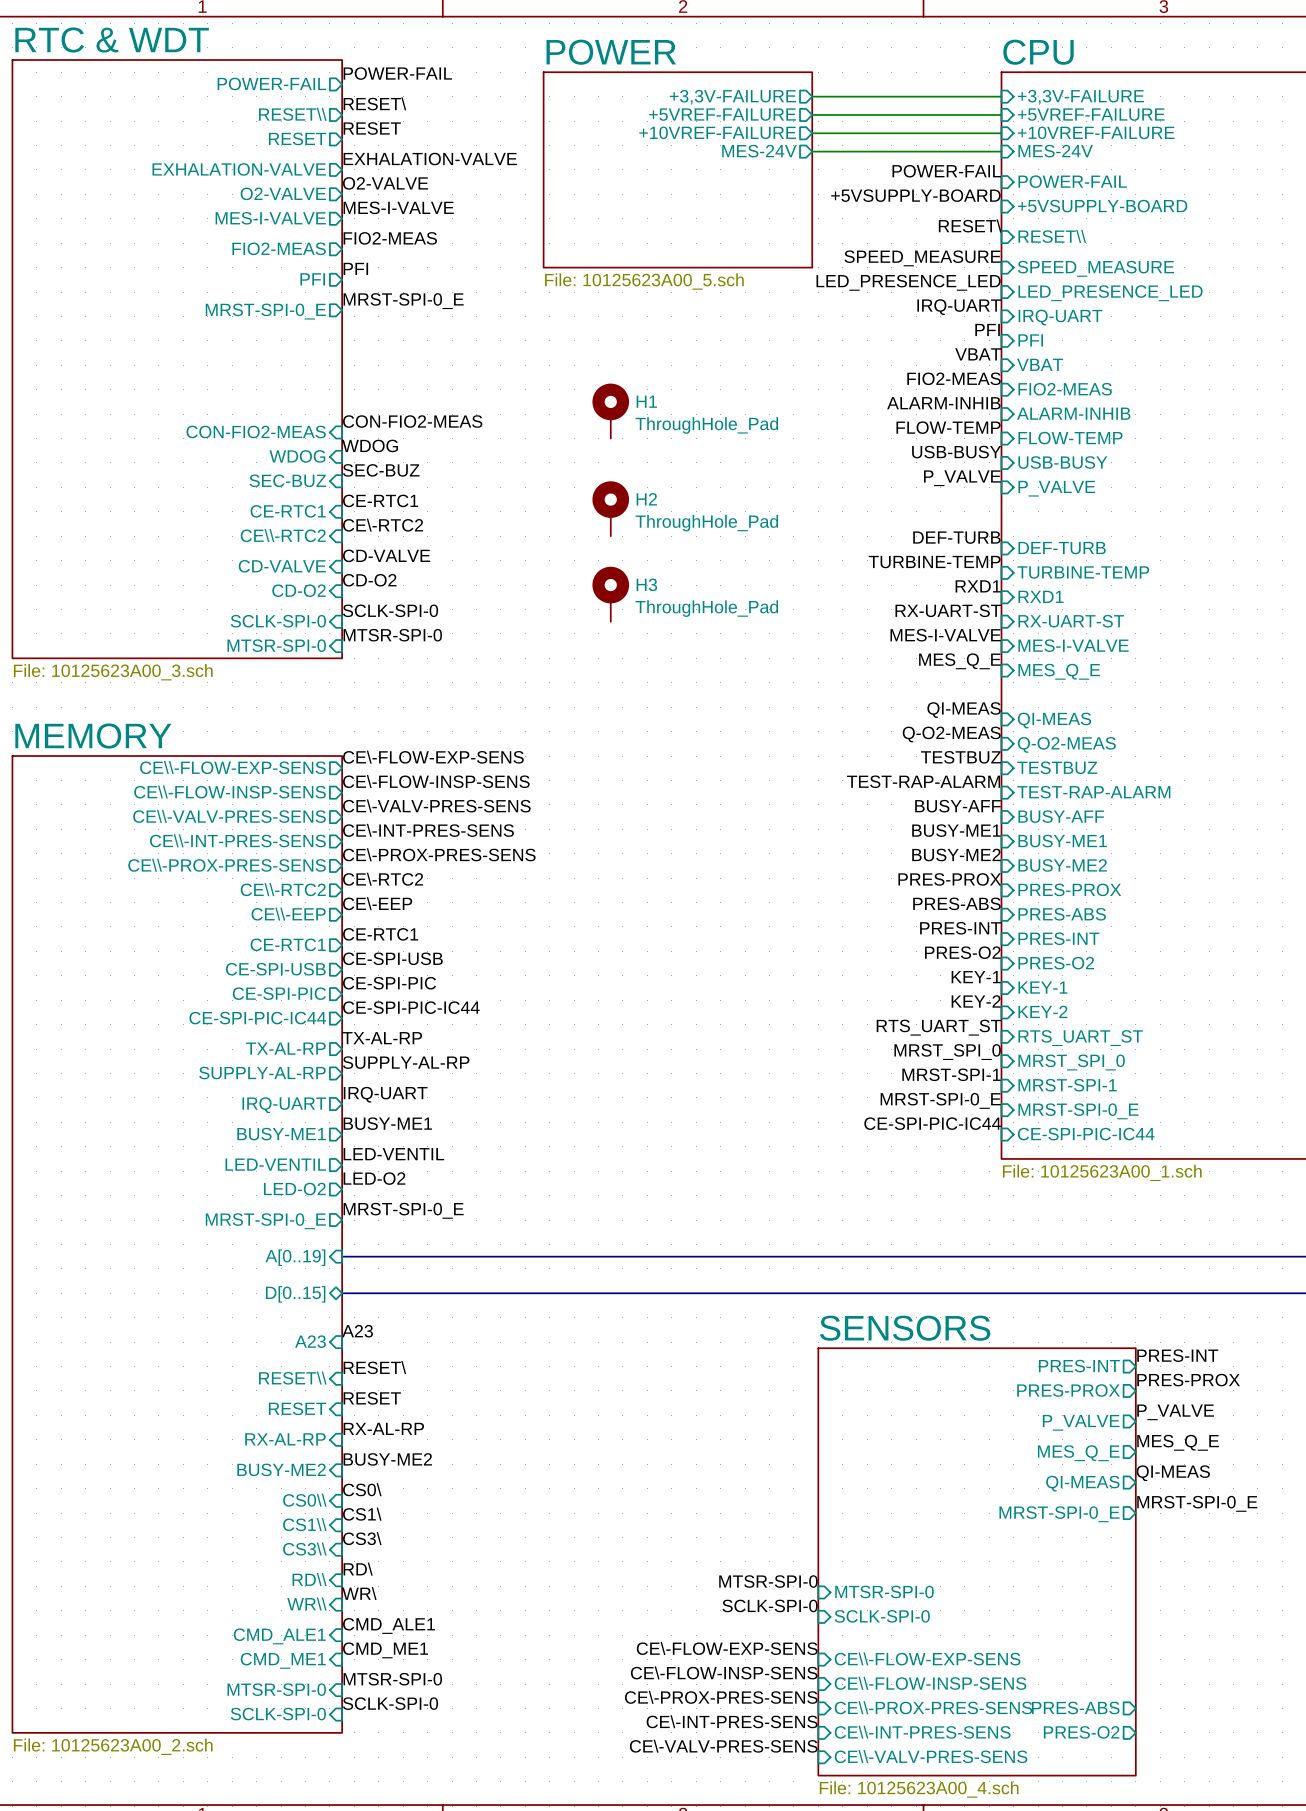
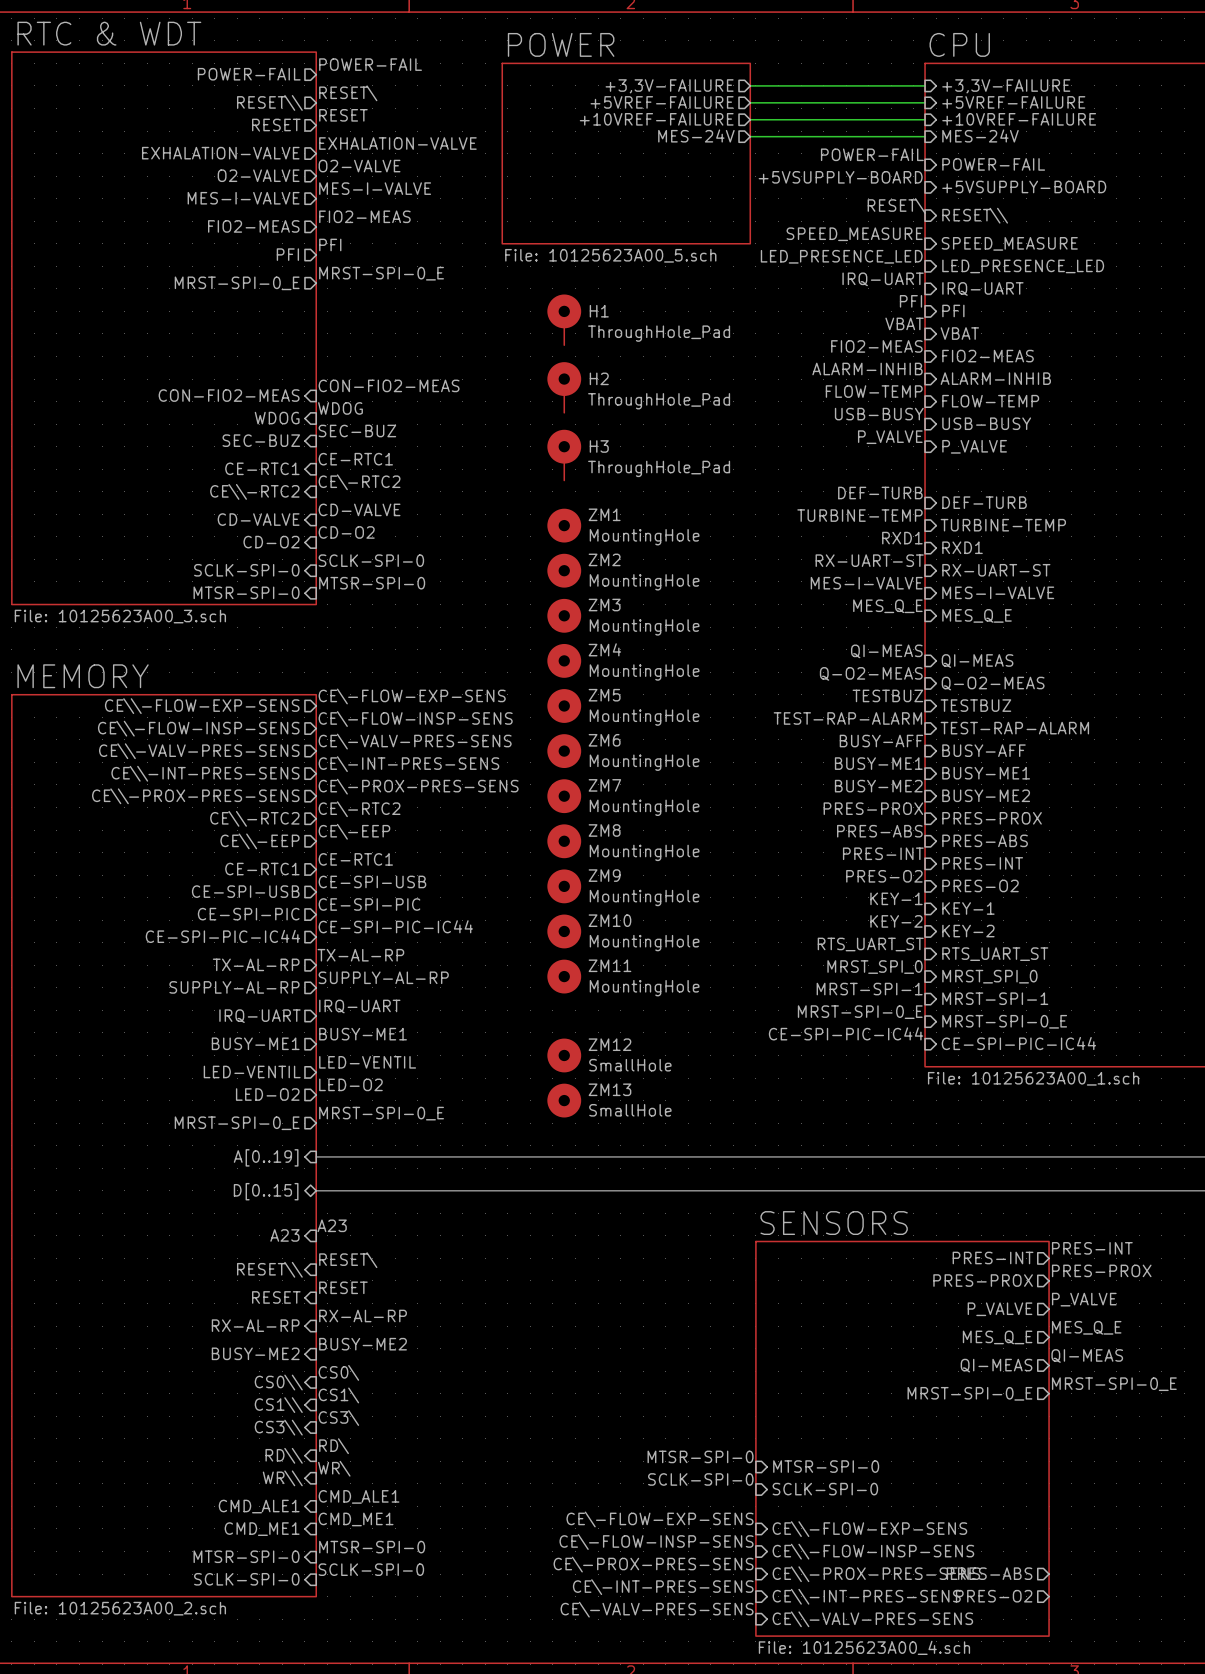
H1 position: (610, 411) -> (564, 319)
H2 position: (610, 508) -> (564, 387)
ZM1: none -> MountingHole (564, 525)
H3 position: (610, 594) -> (564, 455)
ZM2: none -> MountingHole (564, 570)
ZM3: none -> MountingHole (564, 615)
ZM4: none -> MountingHole (564, 660)
ZM5: none -> MountingHole (564, 705)
ZM6: none -> MountingHole (564, 751)
ZM7: none -> MountingHole (564, 796)
ZM8: none -> MountingHole (564, 841)
ZM9: none -> MountingHole (564, 886)
ZM10: none -> MountingHole (564, 931)
ZM11: none -> MountingHole (564, 976)
ZM12: none -> SmallHole (564, 1055)
ZM13: none -> SmallHole (564, 1100)

